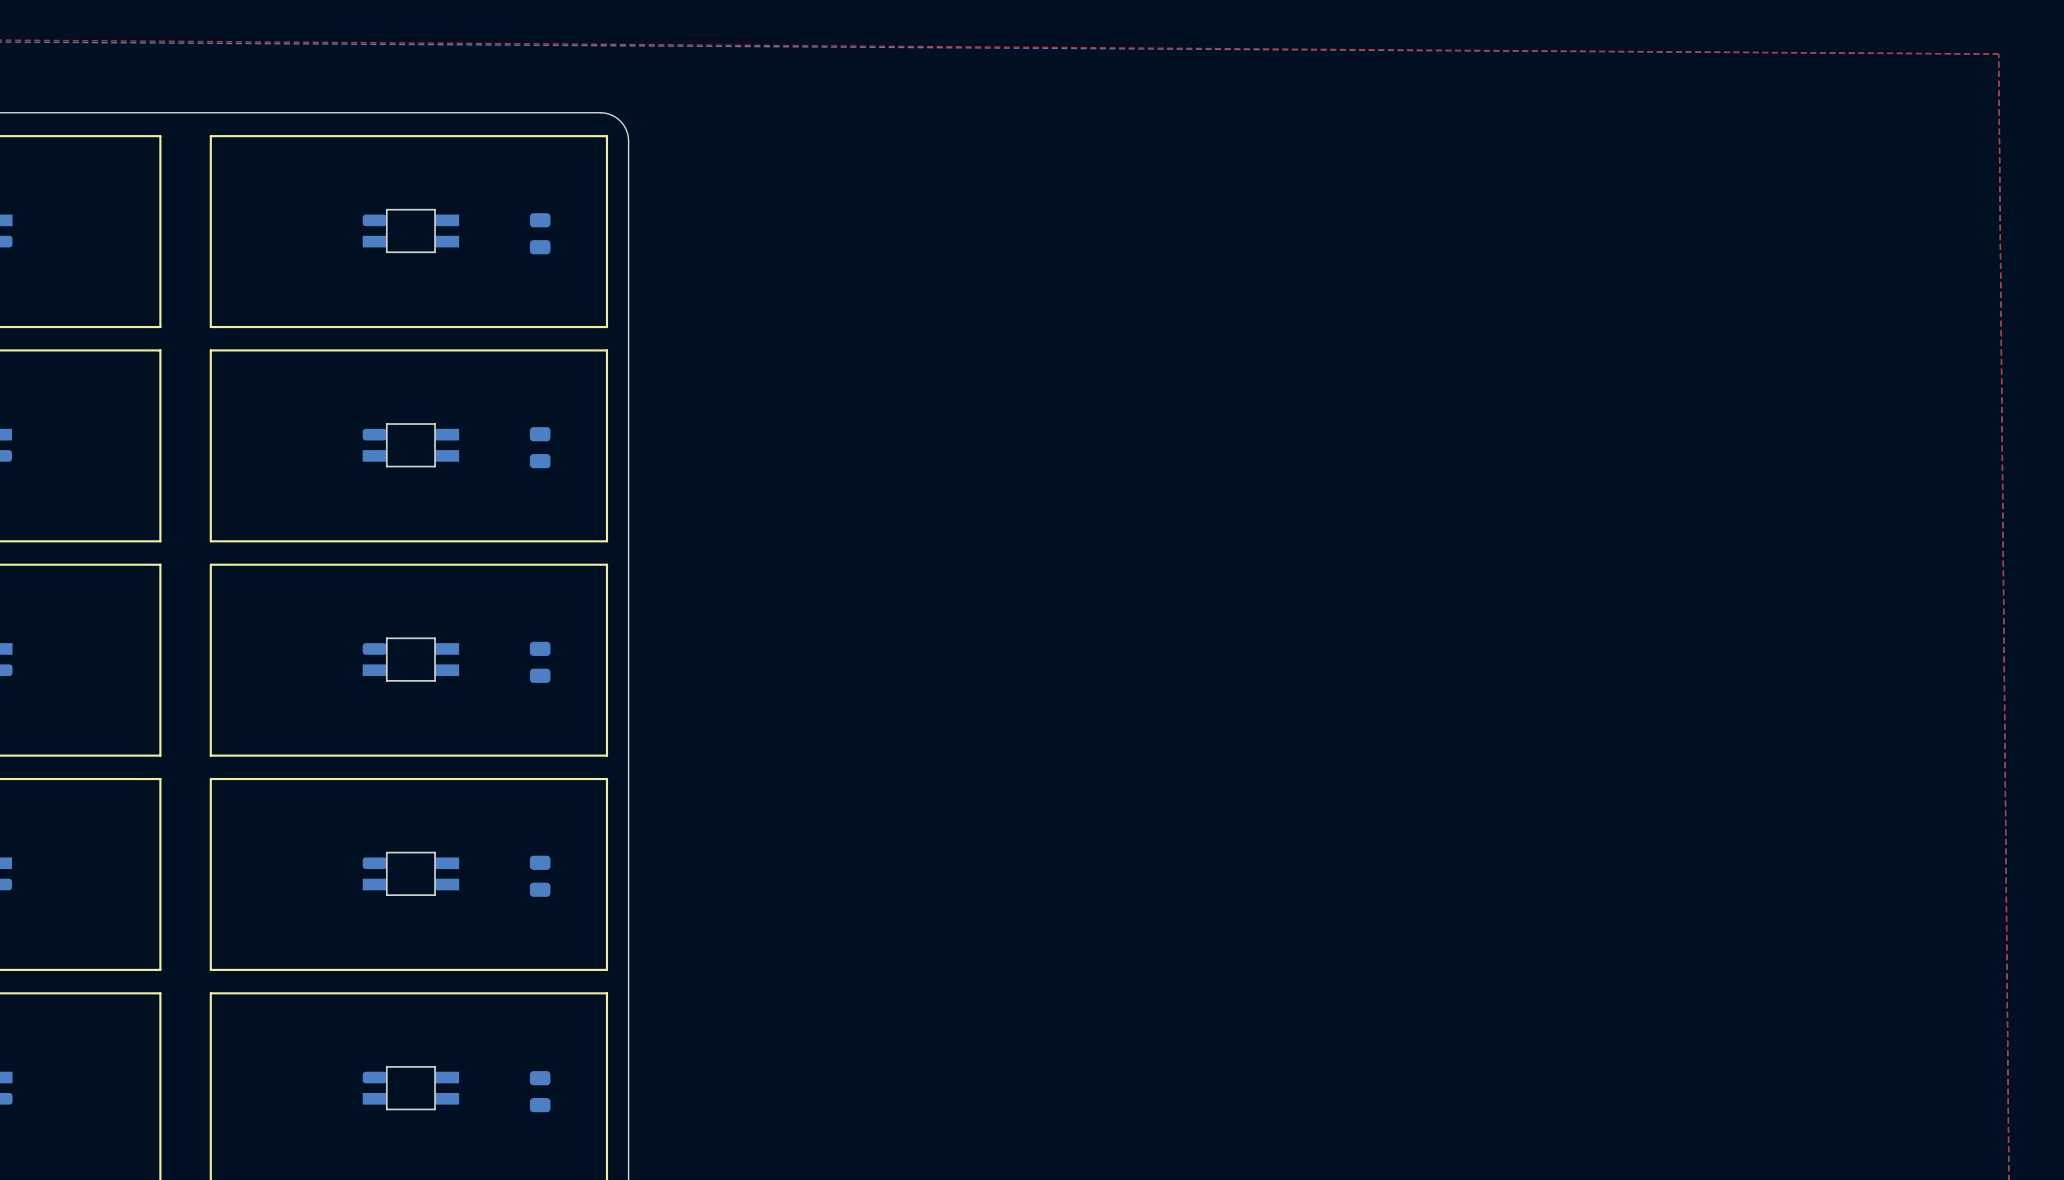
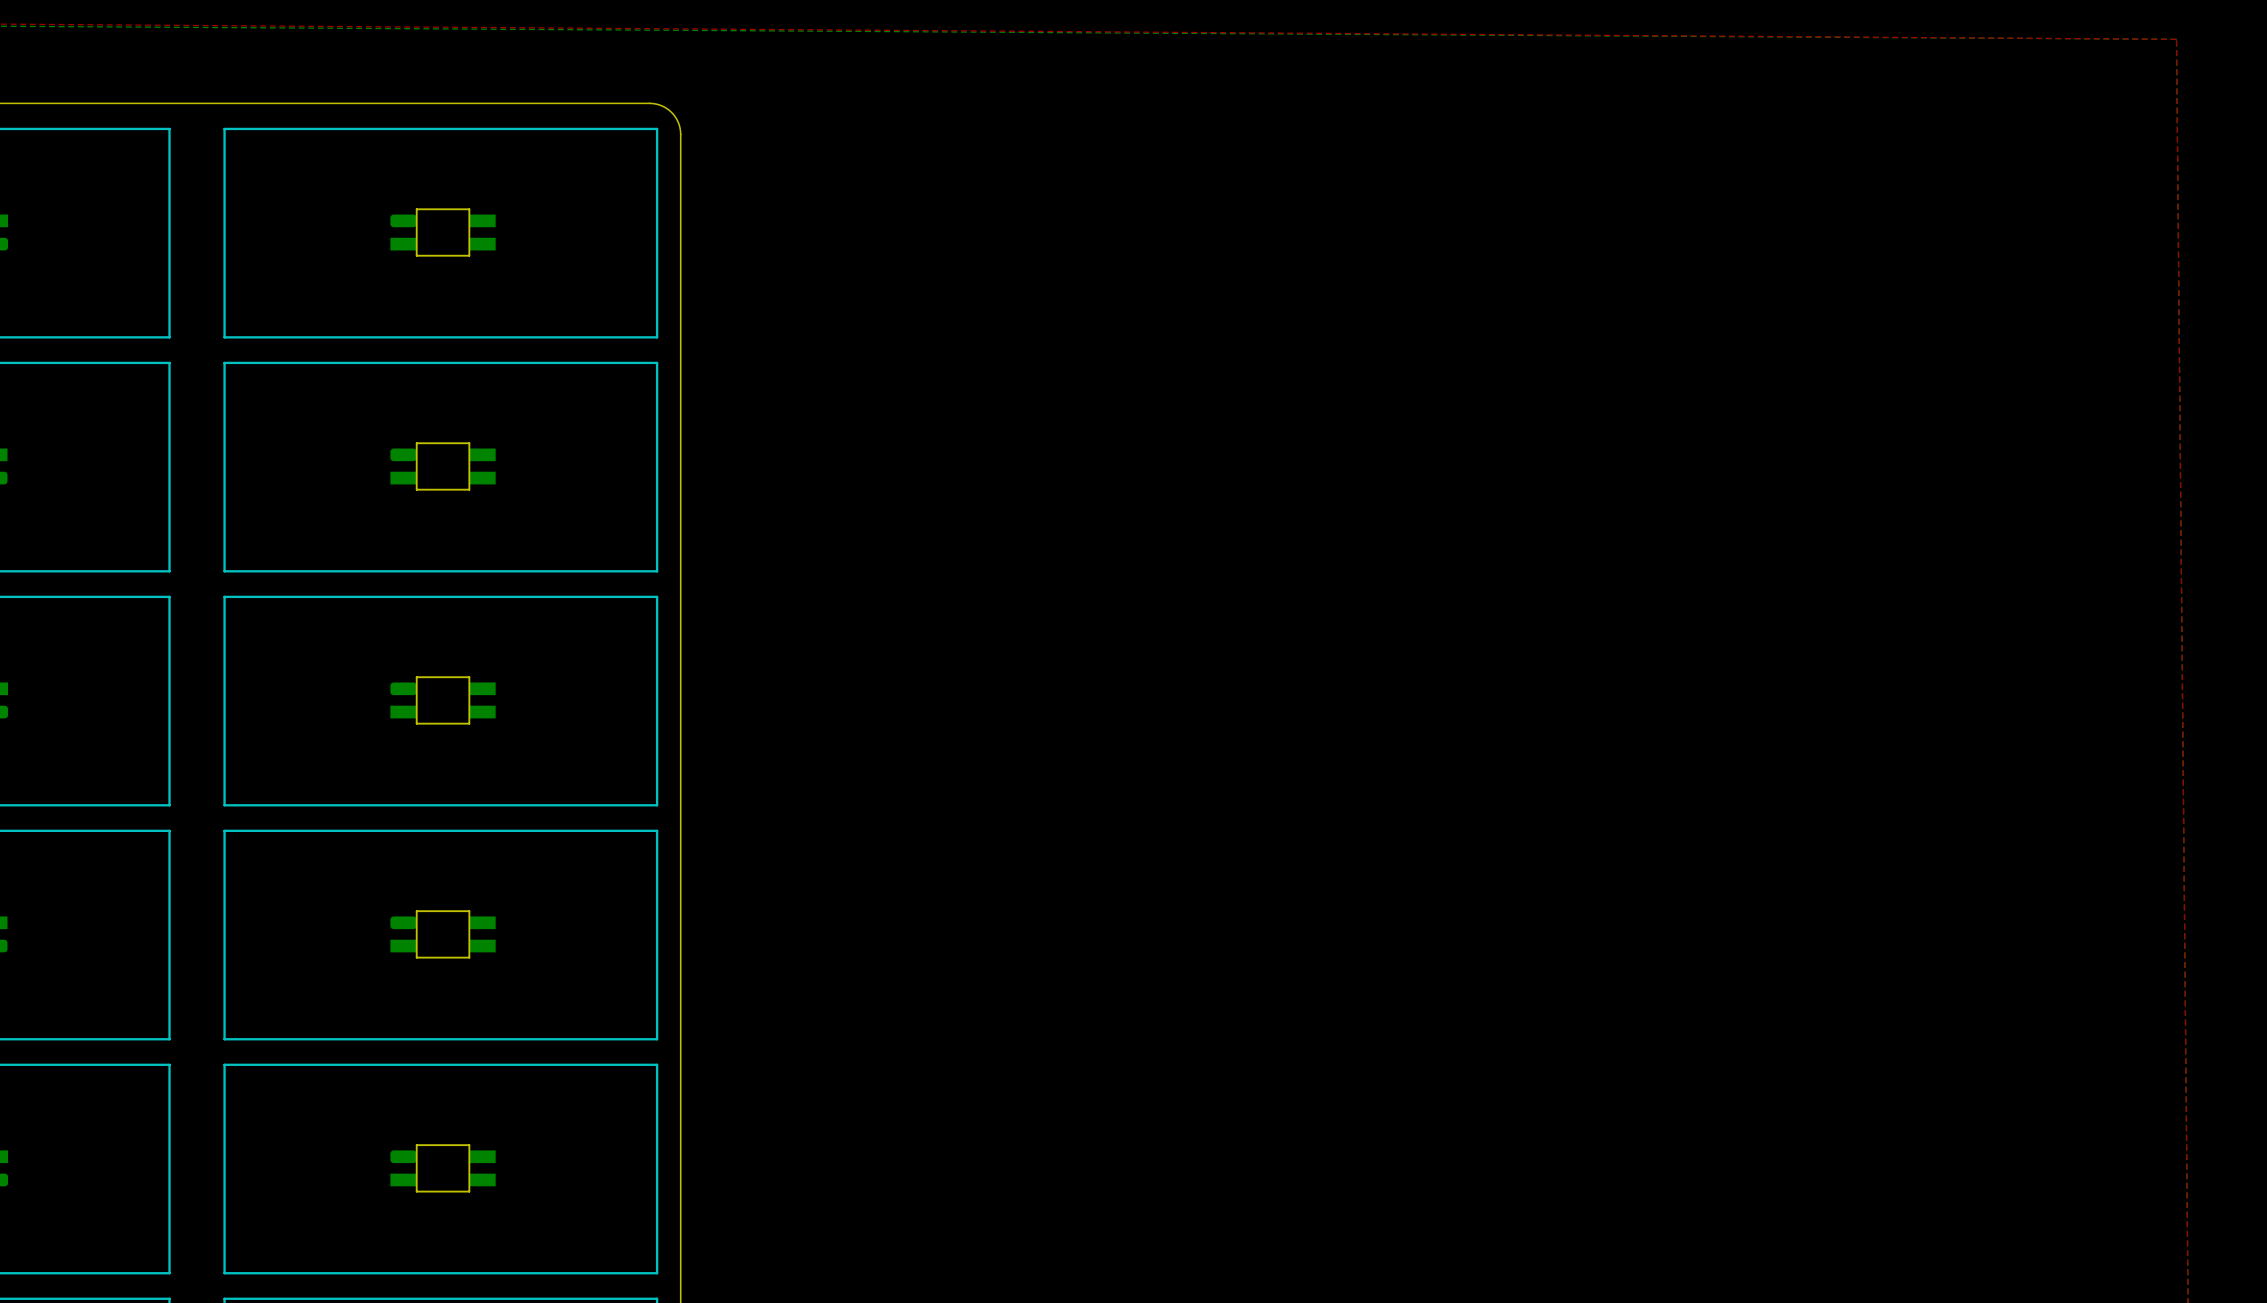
part: (540, 233) -> none
part: (540, 447) -> none
part: (540, 662) -> none
part: (540, 876) -> none
part: (540, 1091) -> none

